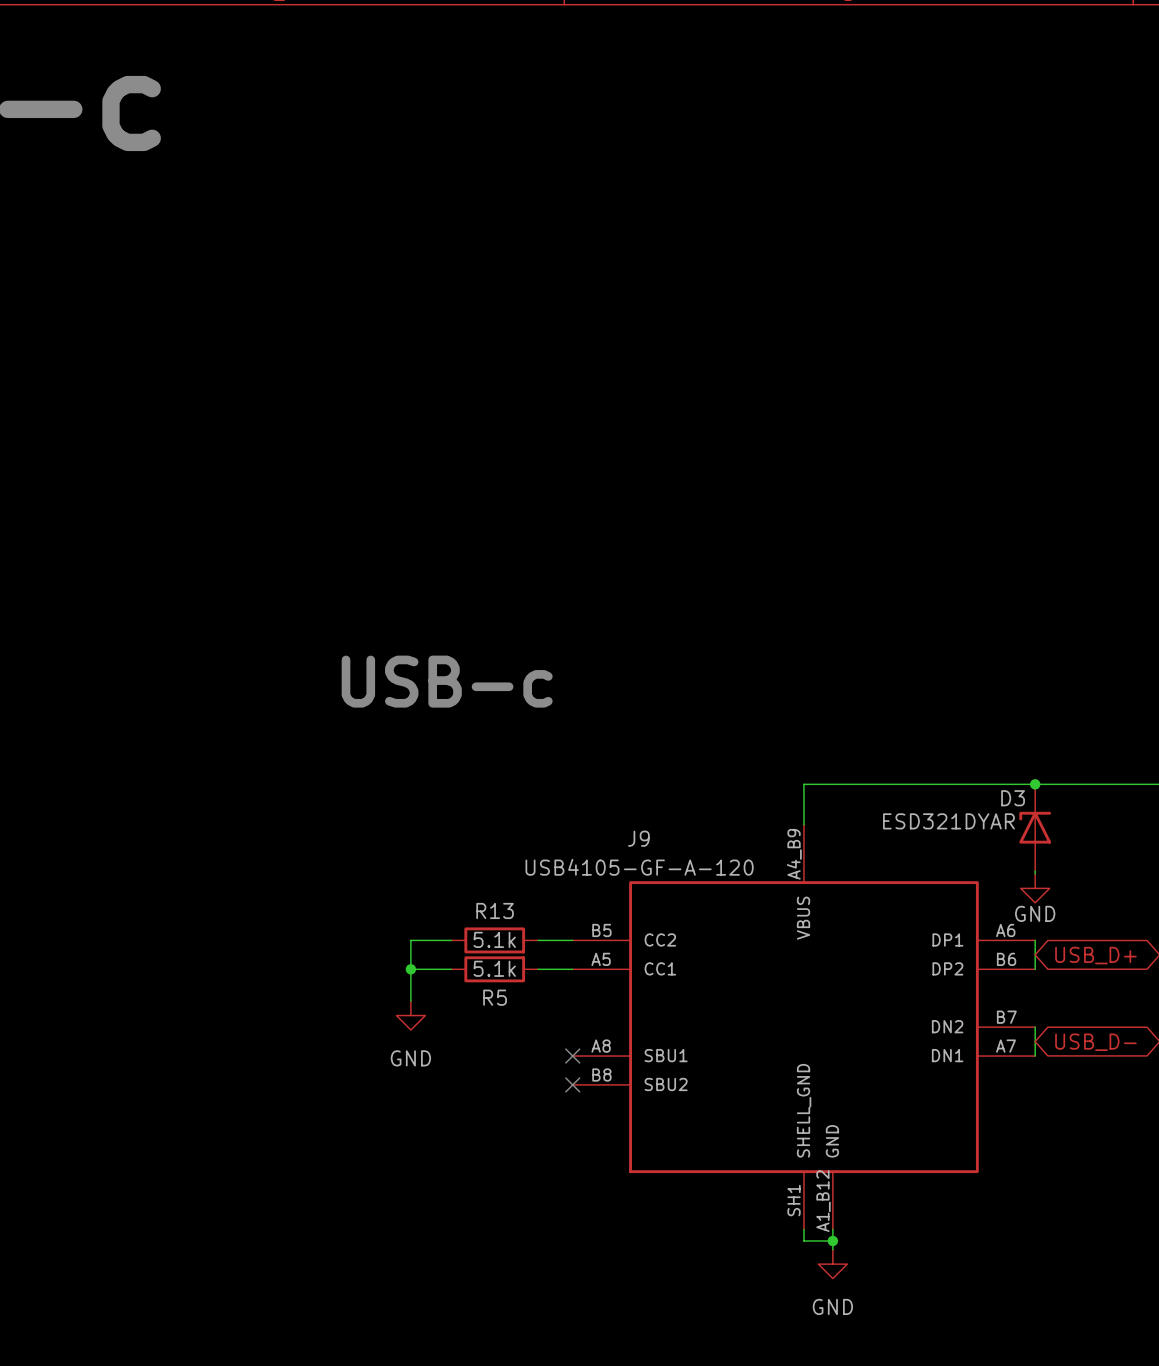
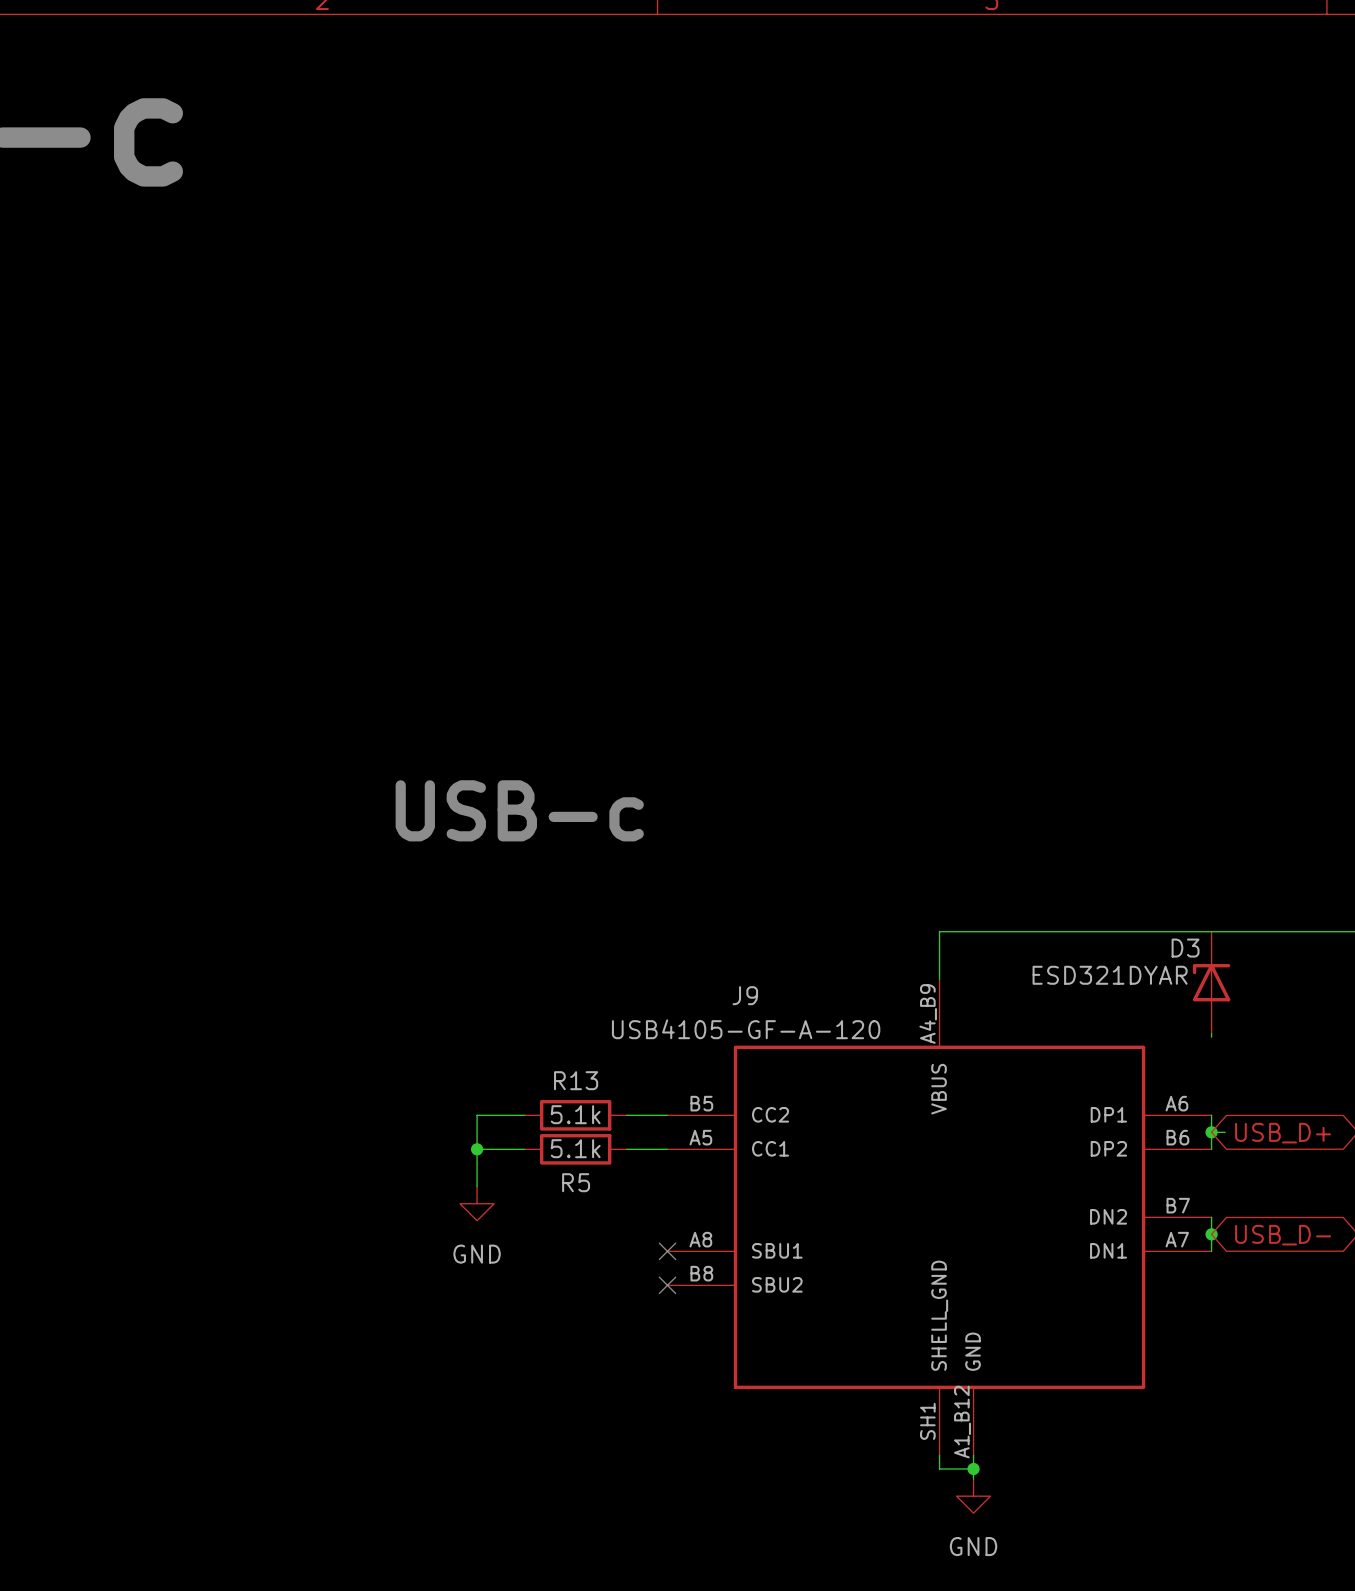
junction: (1035, 784) -> none
power symbol: GND (1035, 888) -> none
wire: none -> (1211, 1132) (1225, 1132)
junction: none -> (1211, 1132)
junction: none -> (1211, 1234)

